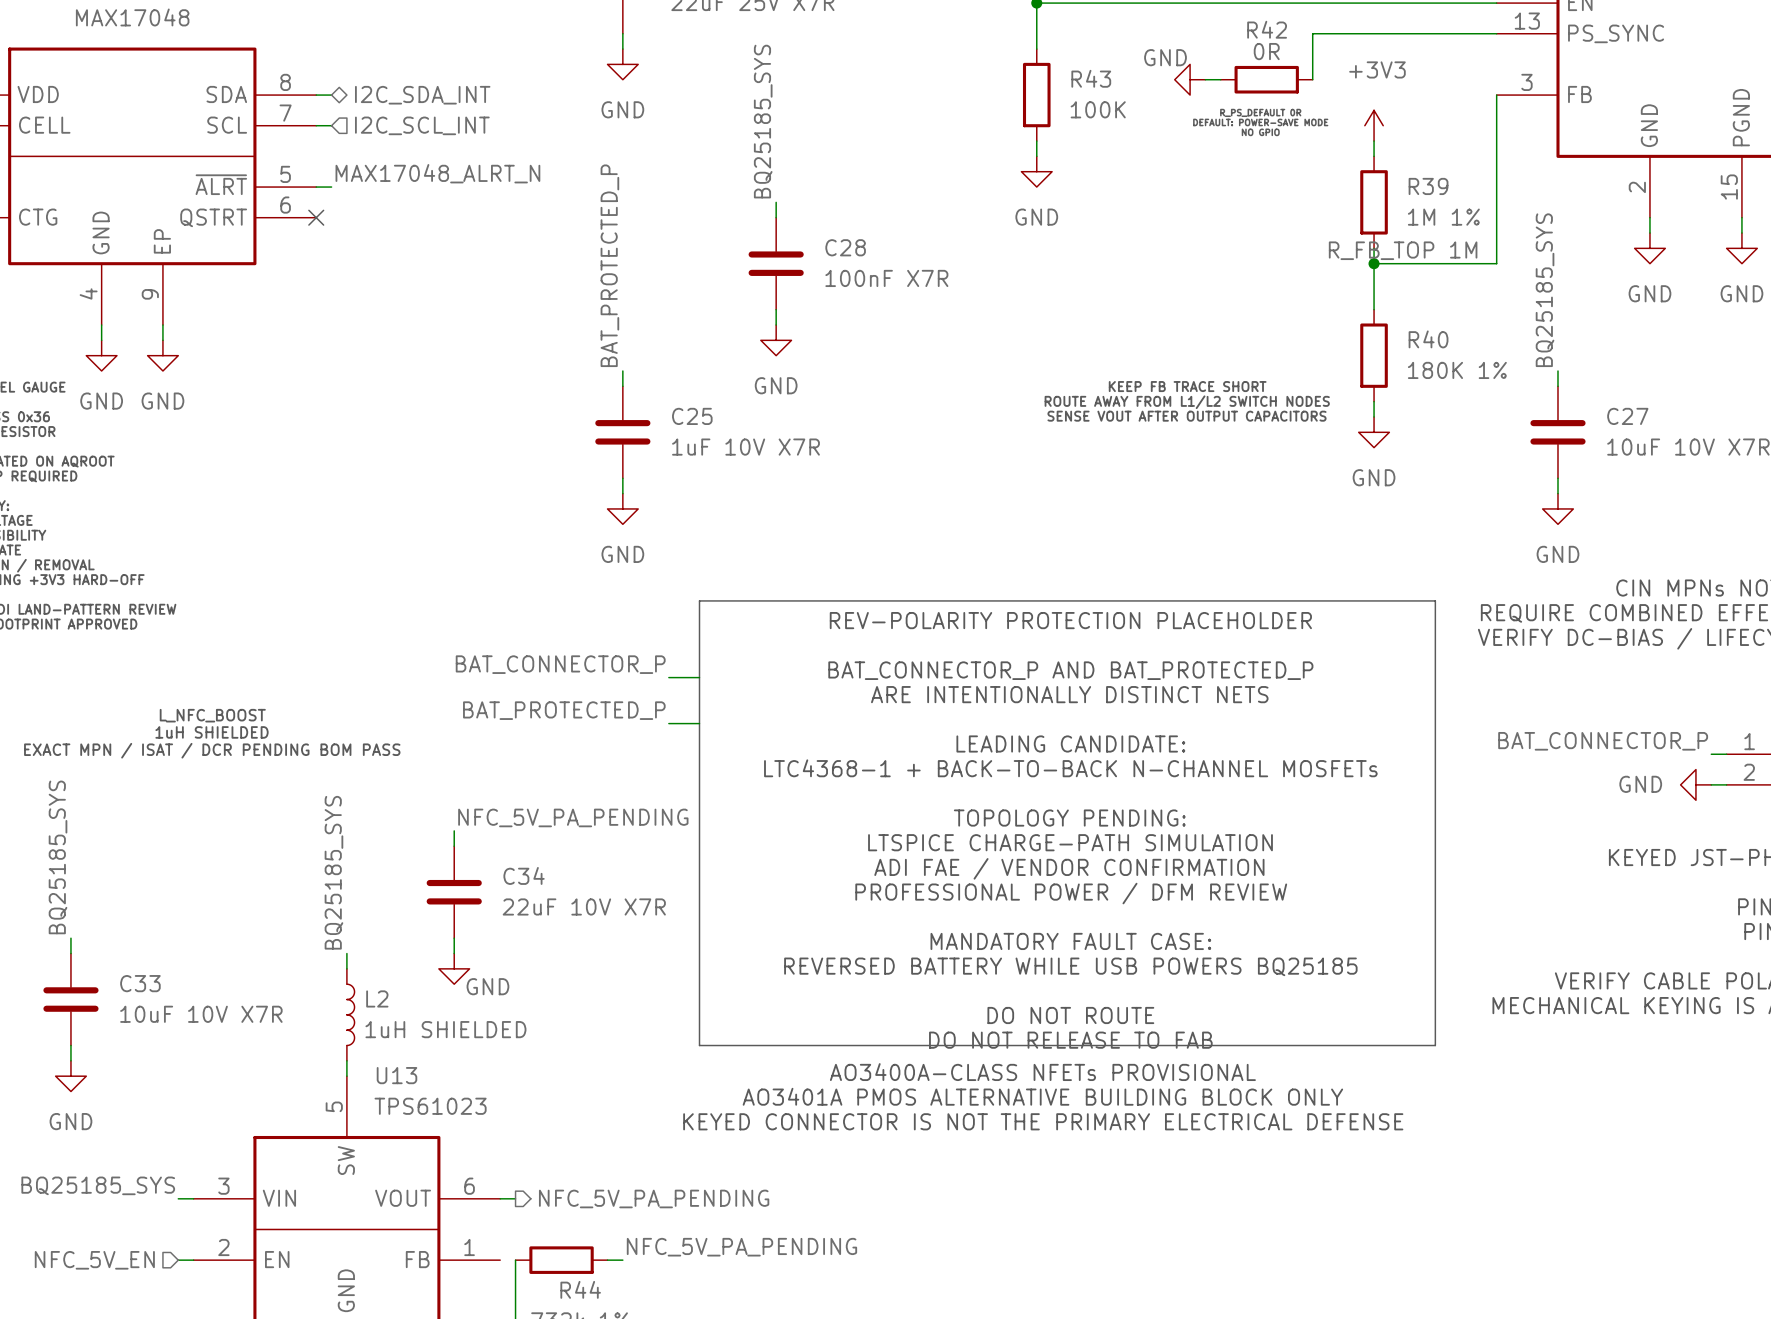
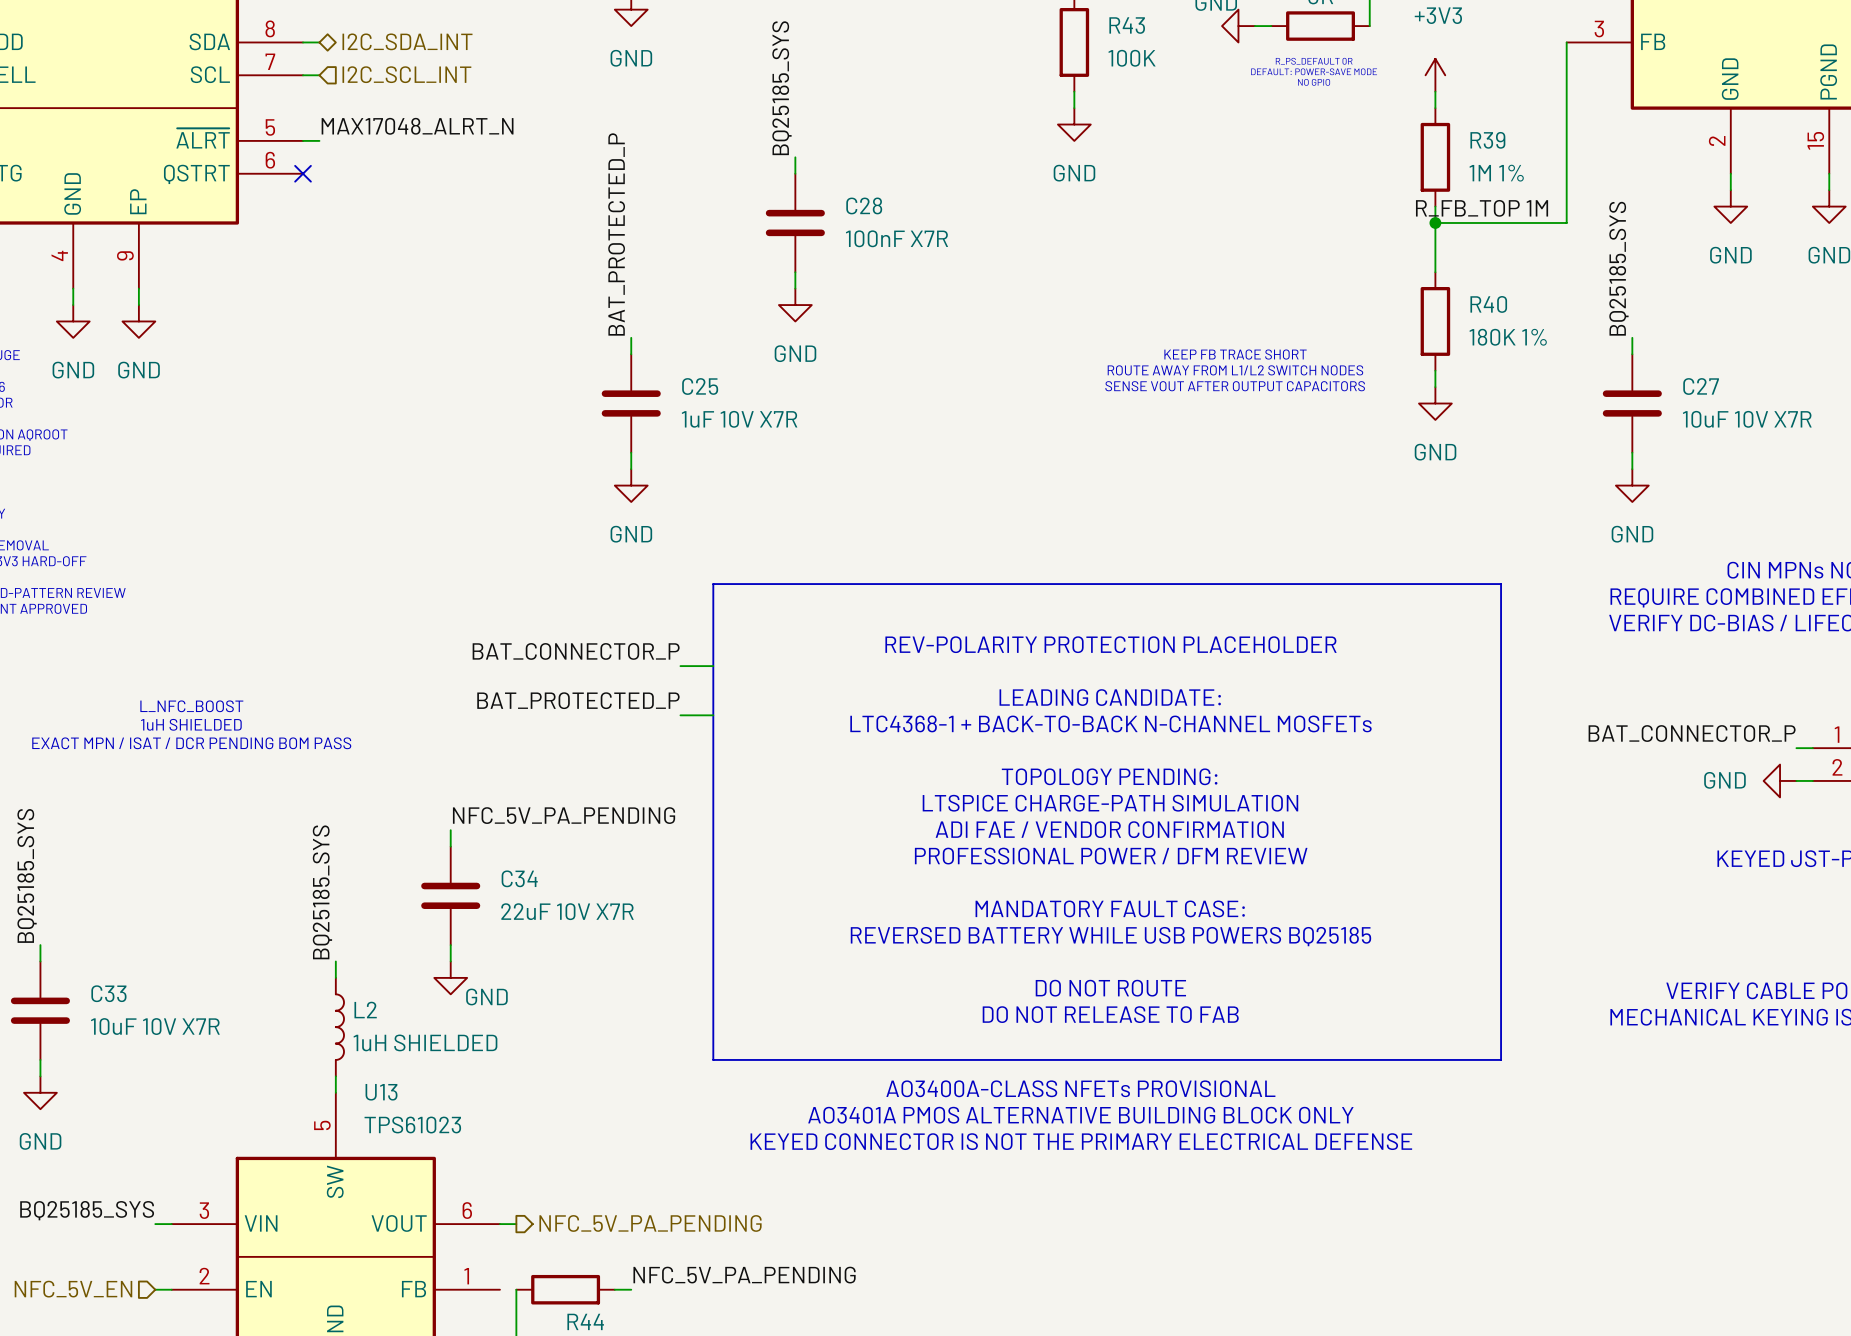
text position: REV-POLARITY PROTECTION PLACEHOLDER (1070, 620) -> REV-POLARITY PROTECTION PLACEHOLDER (1110, 644)
text: BAT_CONNECTOR_P AND BAT_PROTECTED_P (1070, 670) -> none
text: ARE INTENTIONALLY DISTINCT NETS (1069, 694) -> none
text position: LEADING CANDIDATE: (1070, 743) -> LEADING CANDIDATE: (1110, 697)
text position: LTC4368-1 + BACK-TO-BACK N-CHANNEL MOSFETs (1070, 768) -> LTC4368-1 + BACK-TO-BACK N-CHANNEL MOSFETs (1110, 723)
text position: TOPOLOGY PENDING: (1069, 818) -> TOPOLOGY PENDING: (1109, 776)
text position: LTSPICE CHARGE-PATH SIMULATION (1070, 842) -> LTSPICE CHARGE-PATH SIMULATION (1110, 803)
text position: ADI FAE / VENDOR CONFIRMATION (1069, 868) -> ADI FAE / VENDOR CONFIRMATION (1109, 829)
text position: PROFESSIONAL POWER / DFM REVIEW (1071, 893) -> PROFESSIONAL POWER / DFM REVIEW (1111, 856)
text position: MANDATORY FAULT CASE: (1070, 941) -> MANDATORY FAULT CASE: (1110, 908)
text position: REVERSED BATTERY WHILE USB POWERS BQ25185 (1070, 966) -> REVERSED BATTERY WHILE USB POWERS BQ25185 (1110, 936)
text position: DO NOT ROUTE (1070, 1015) -> DO NOT ROUTE (1110, 988)
text position: DO NOT RELEASE TO FAB (1070, 1040) -> DO NOT RELEASE TO FAB (1110, 1014)

